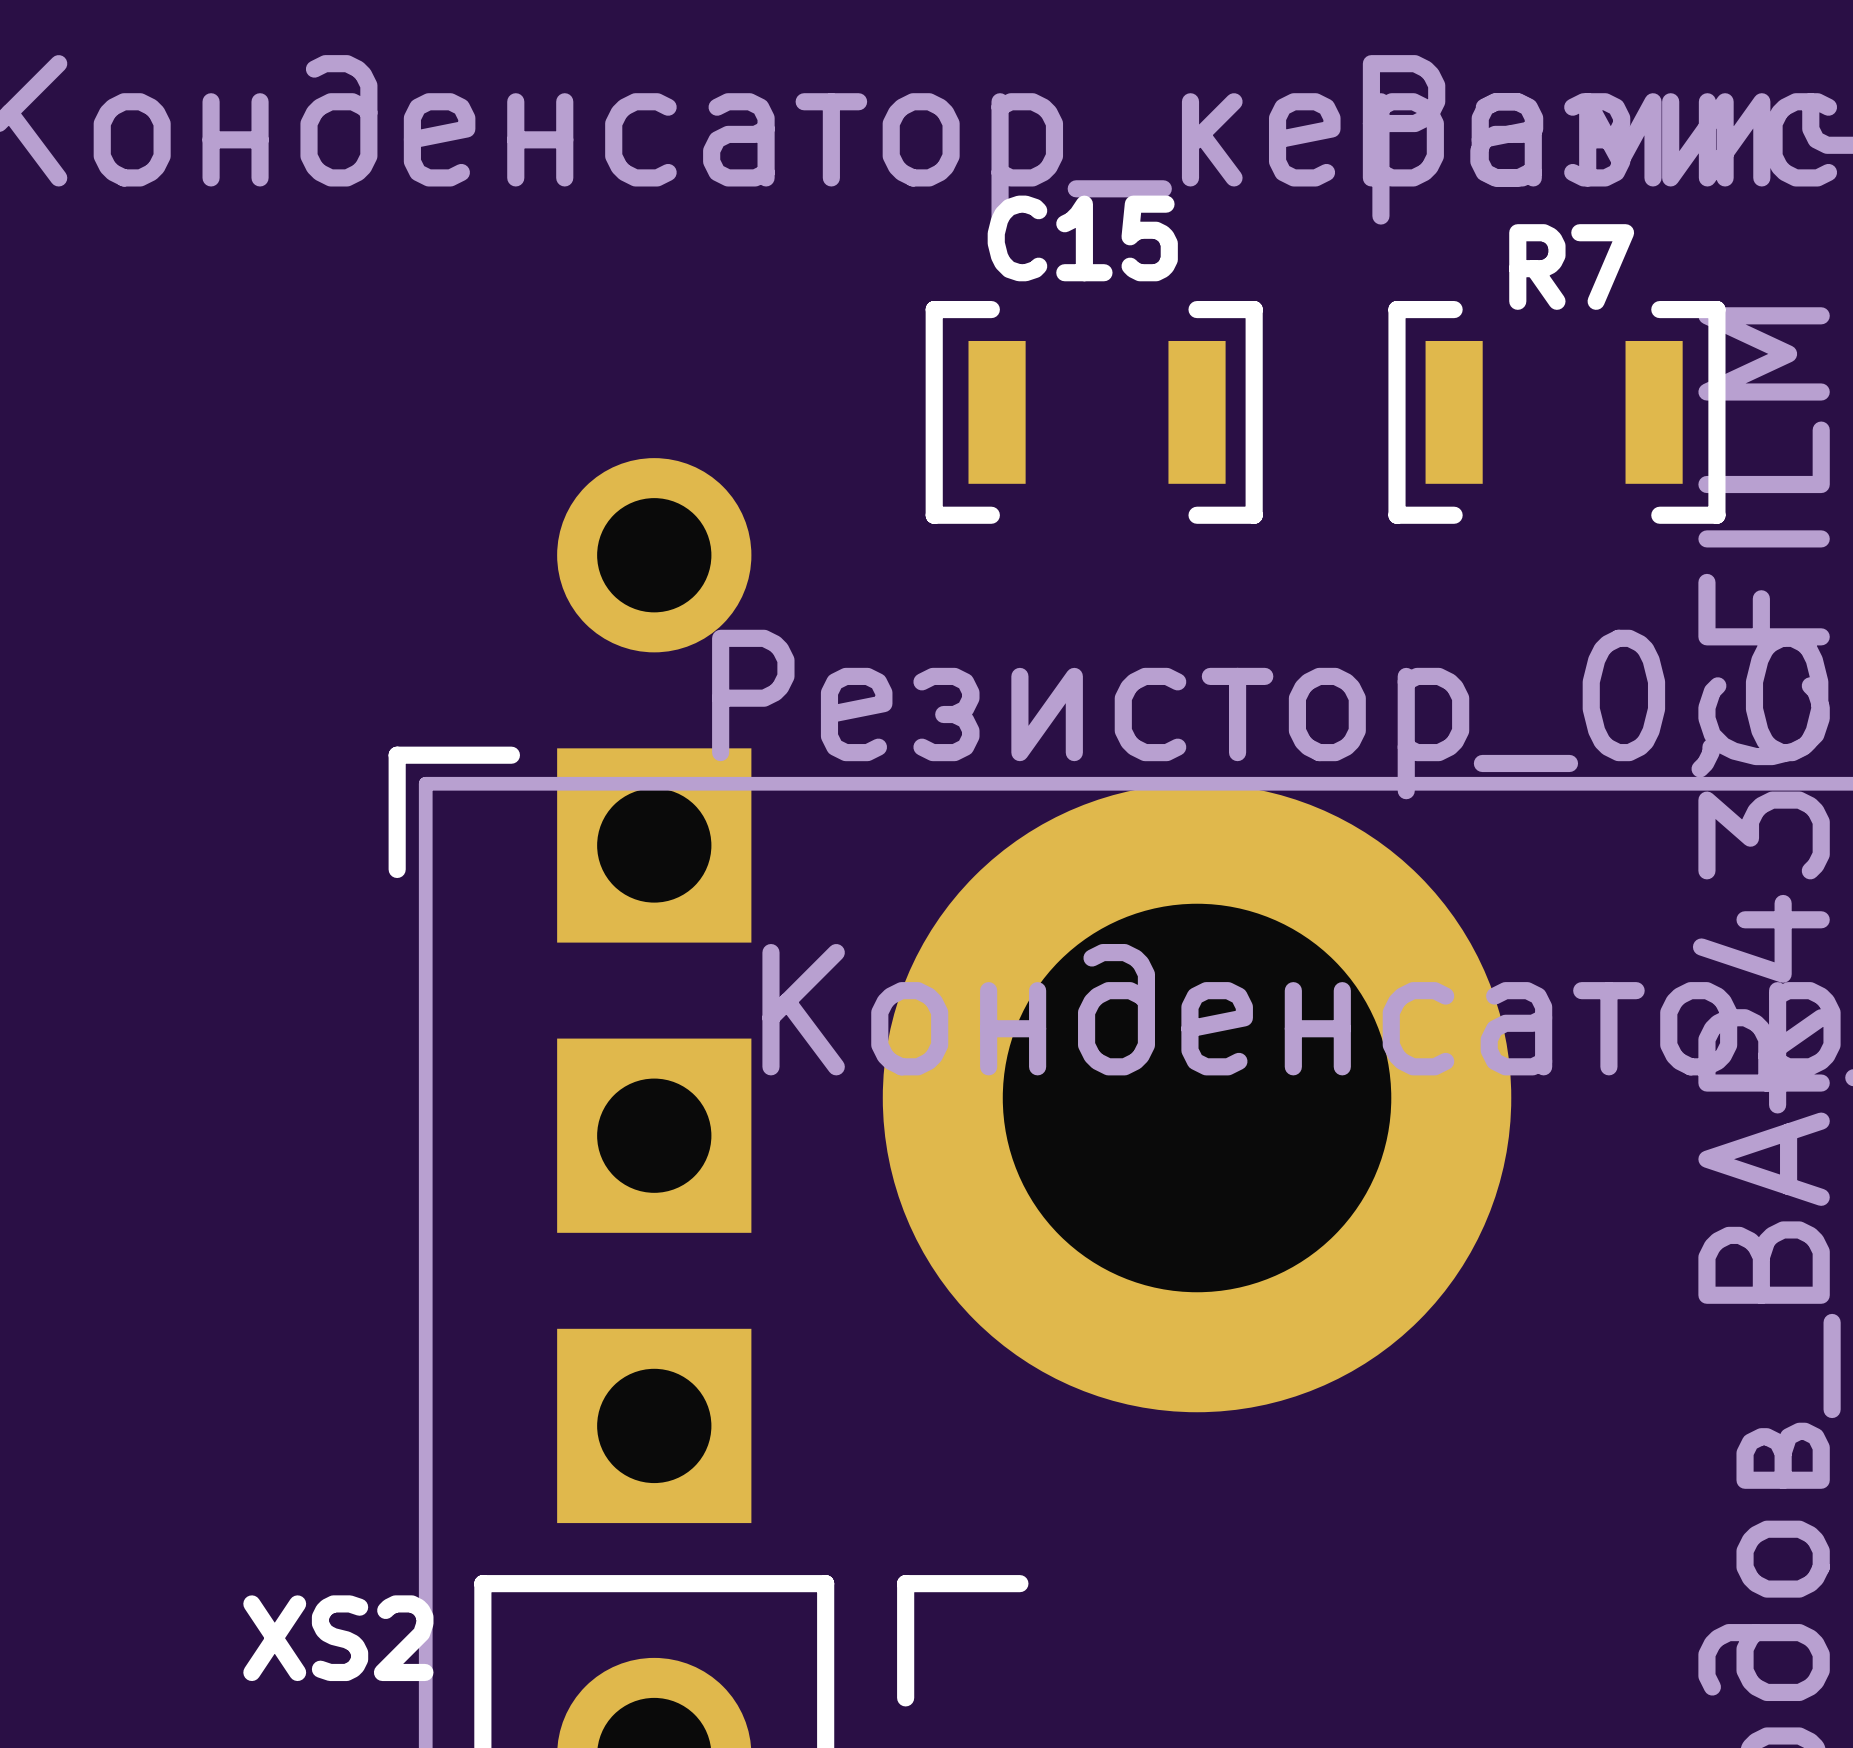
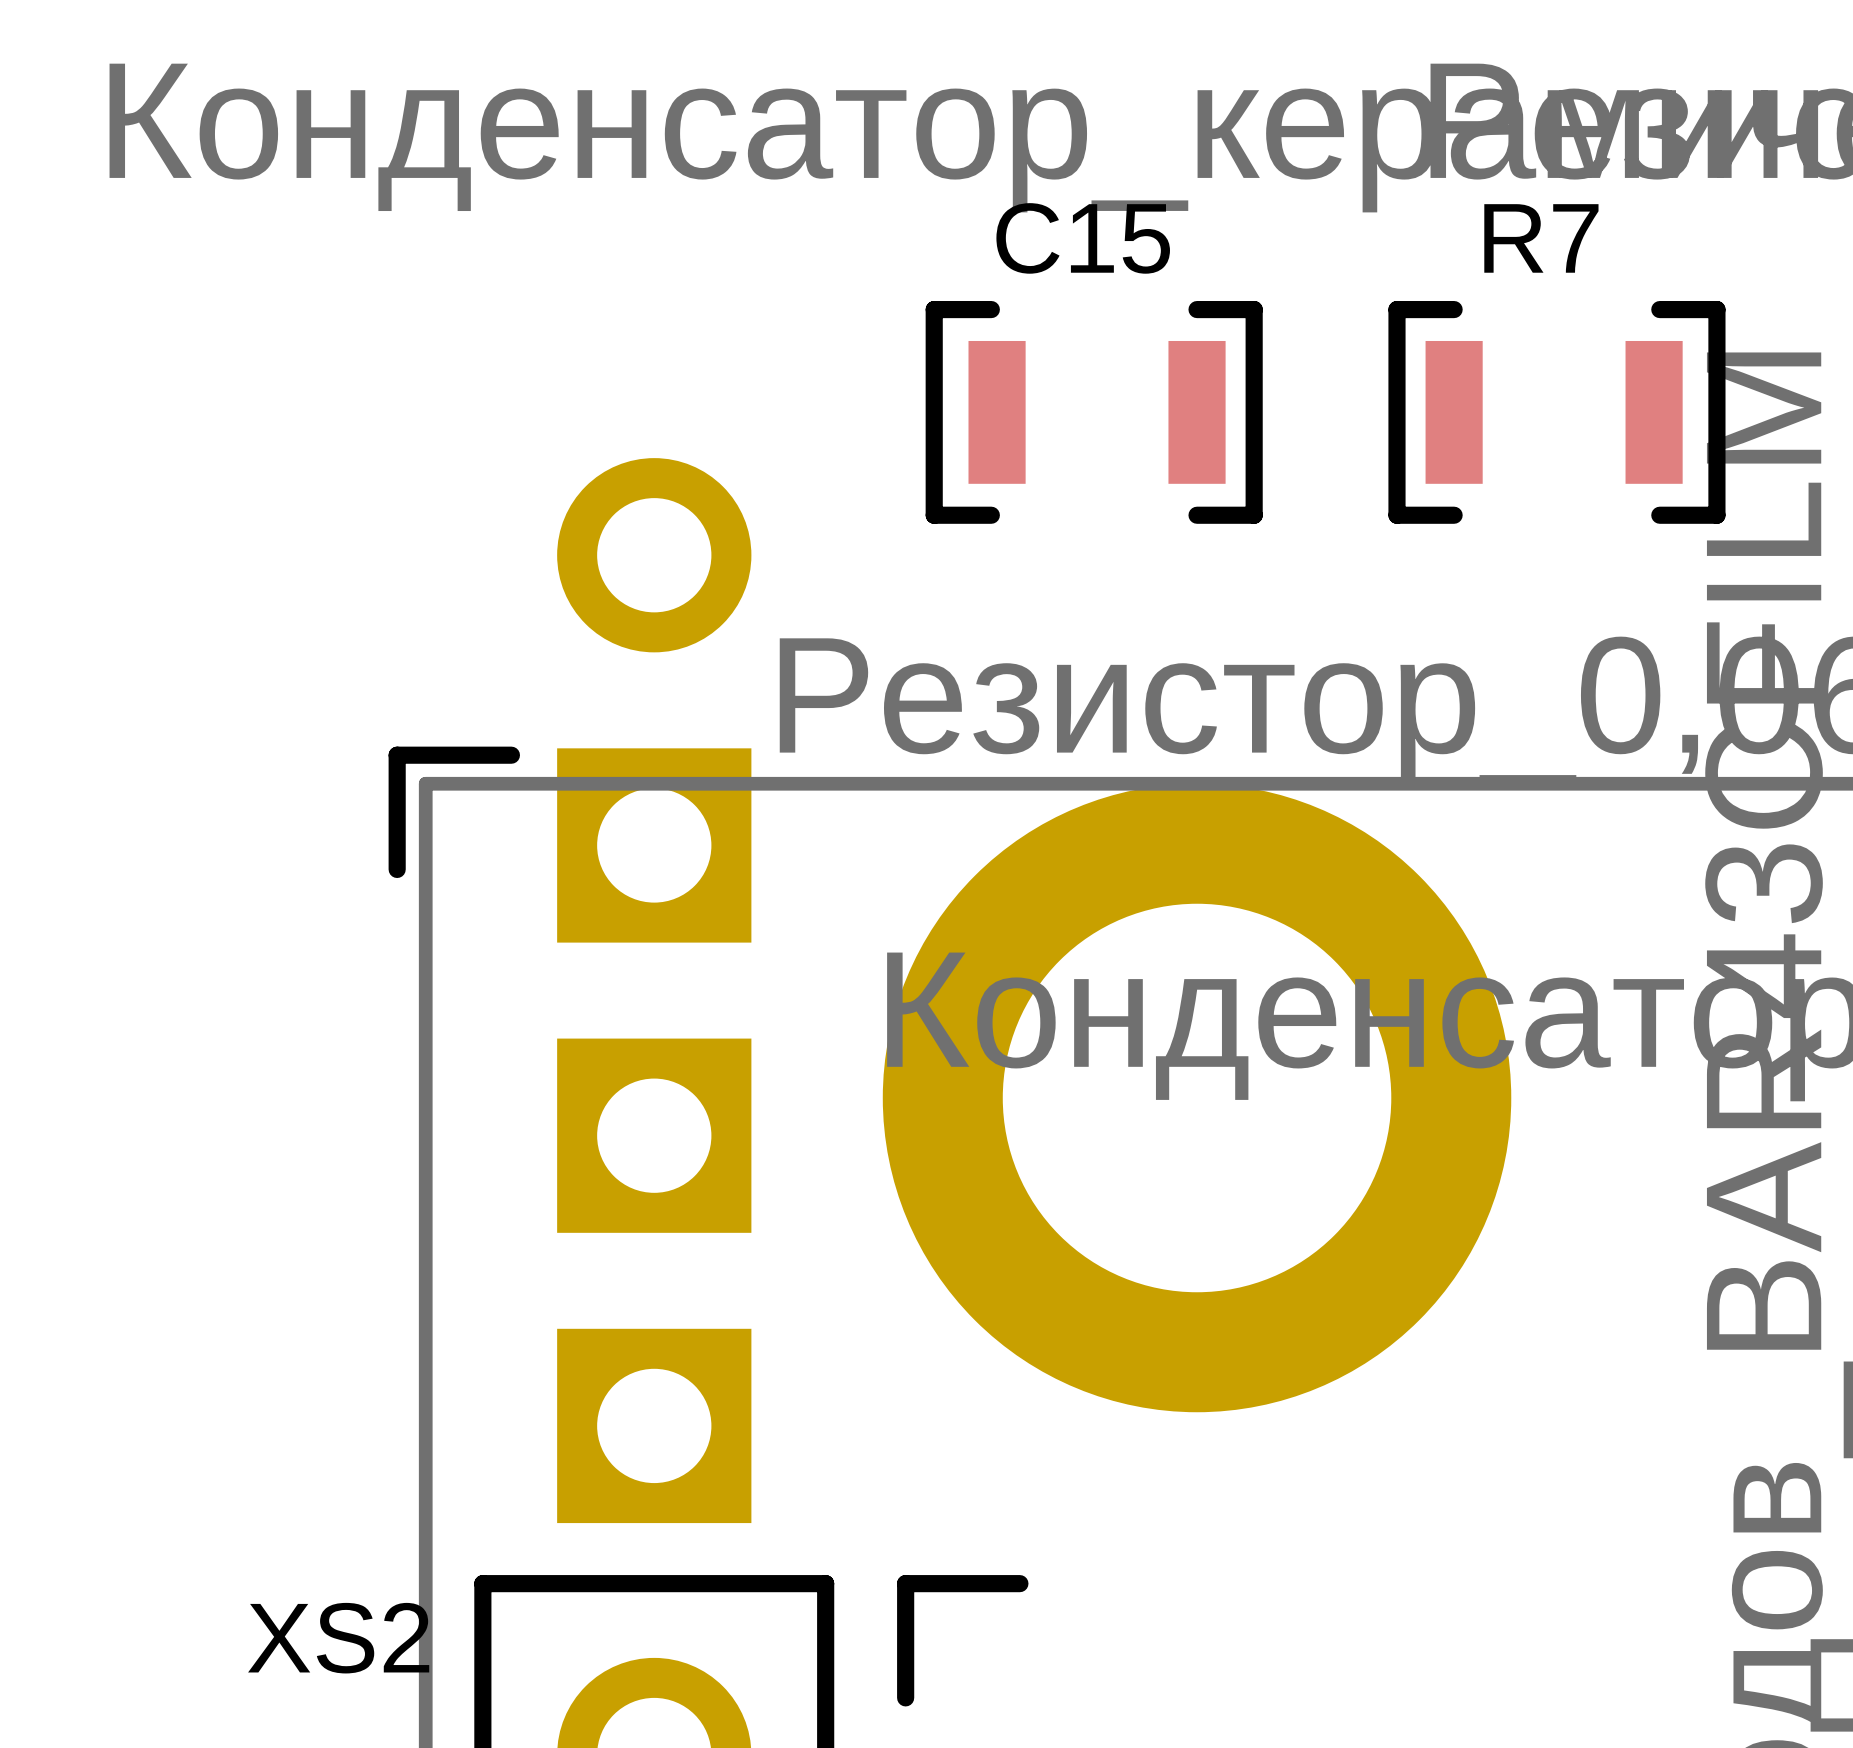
R7 name position: R7 (1571, 267) -> R7 (1541, 238)

